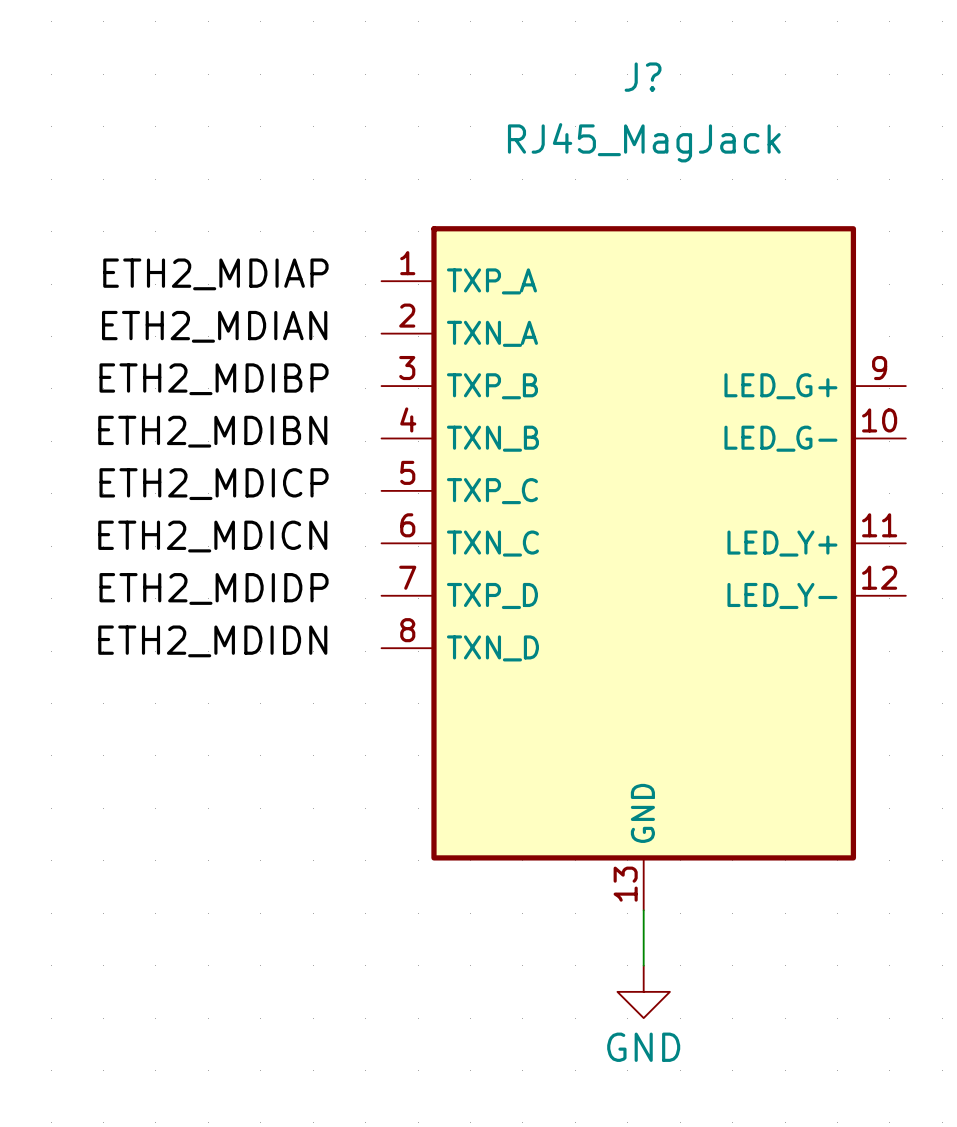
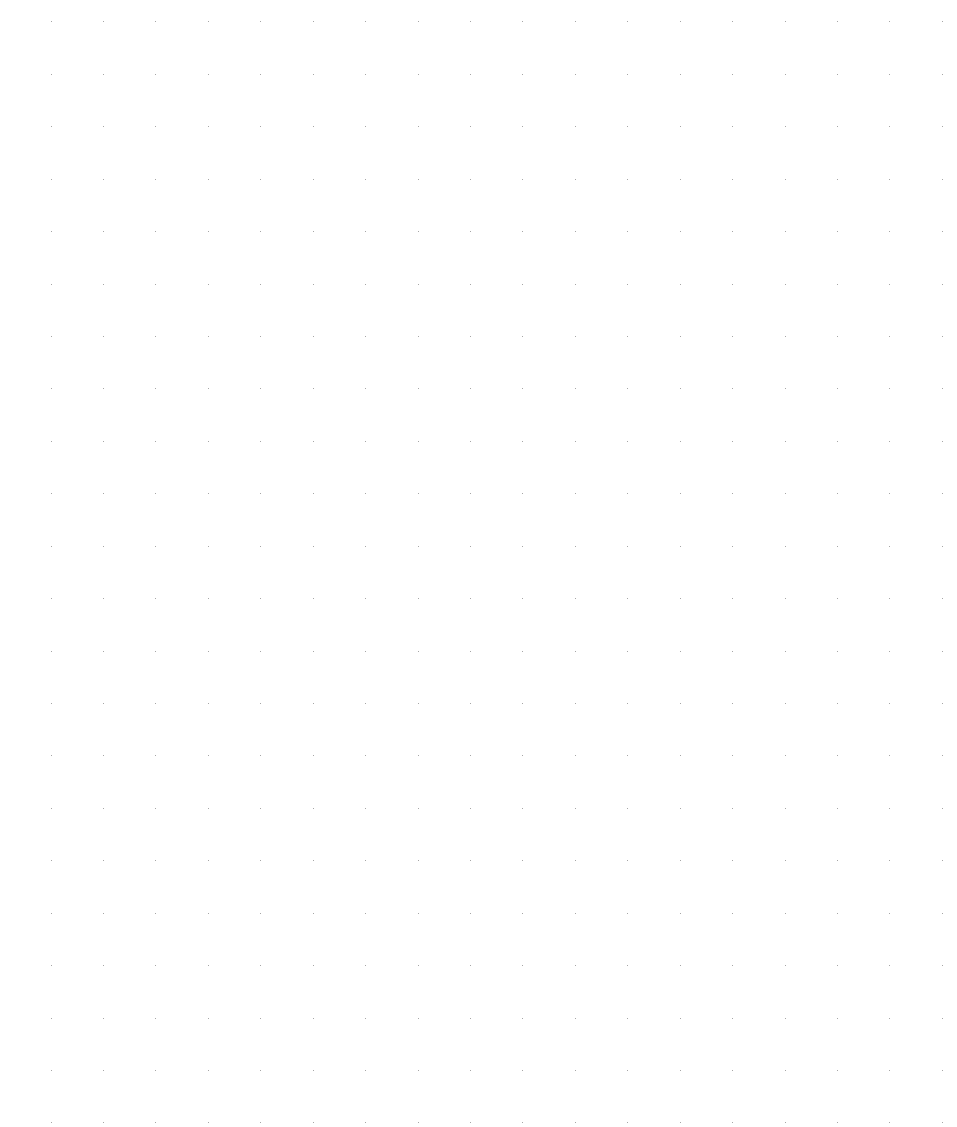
label: ETH2_MDIAP (215, 274) -> none
label: ETH2_MDIAN (214, 326) -> none
label: ETH2_MDIBP (214, 379) -> none
label: ETH2_MDIBN (212, 431) -> none
label: ETH2_MDICP (214, 484) -> none
label: ETH2_MDICN (212, 536) -> none
J?: RJ45_MagJack (643, 568) -> none
label: ETH2_MDIDP (214, 588) -> none
label: ETH2_MDIDN (212, 641) -> none
wire: (643, 910) (643, 965) -> none
power symbol: GND (643, 991) -> none

